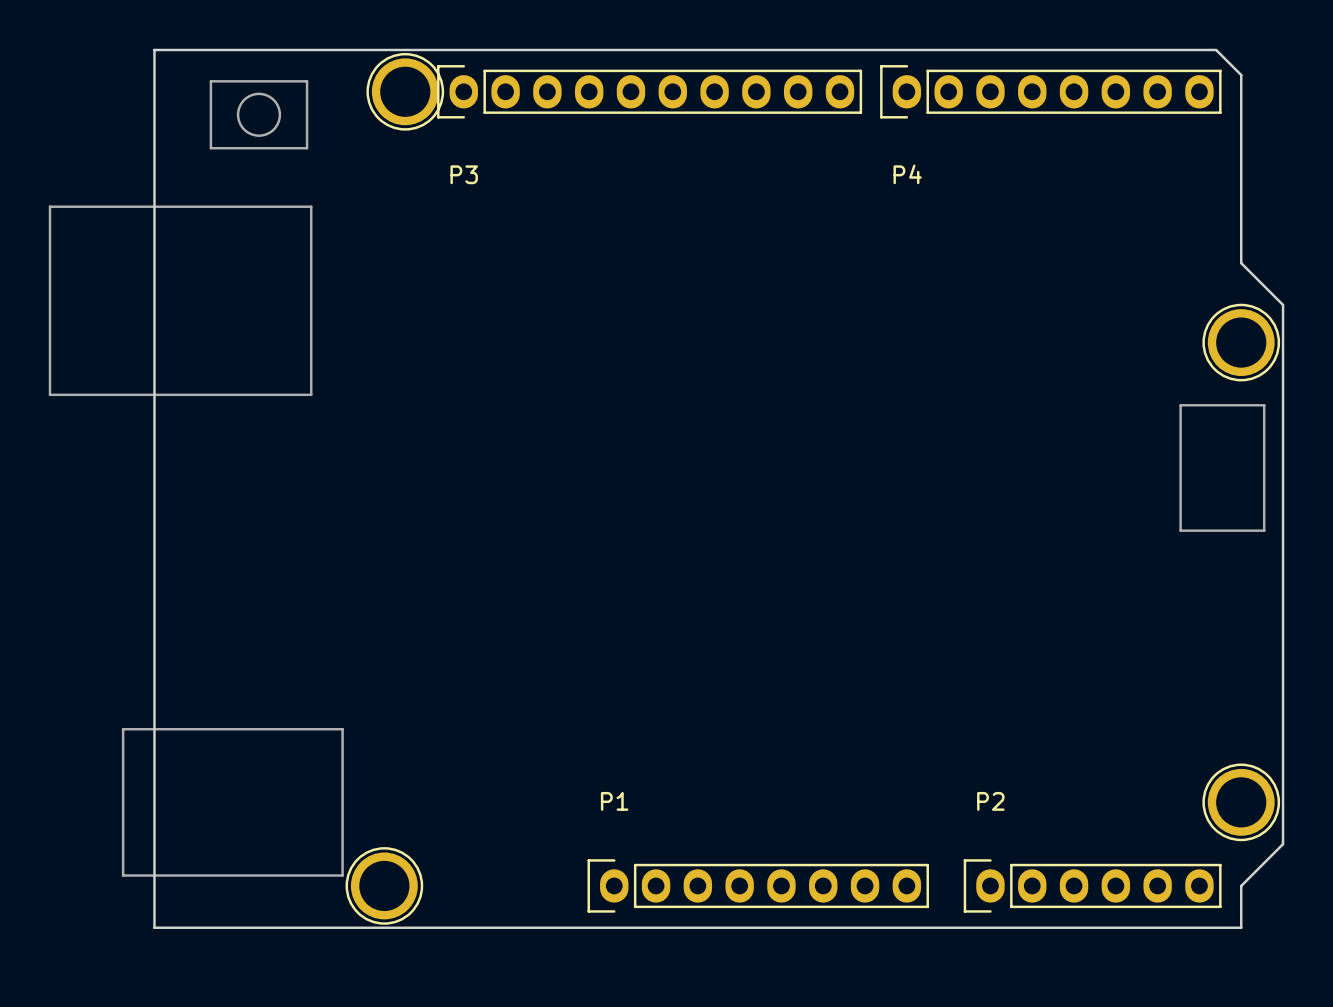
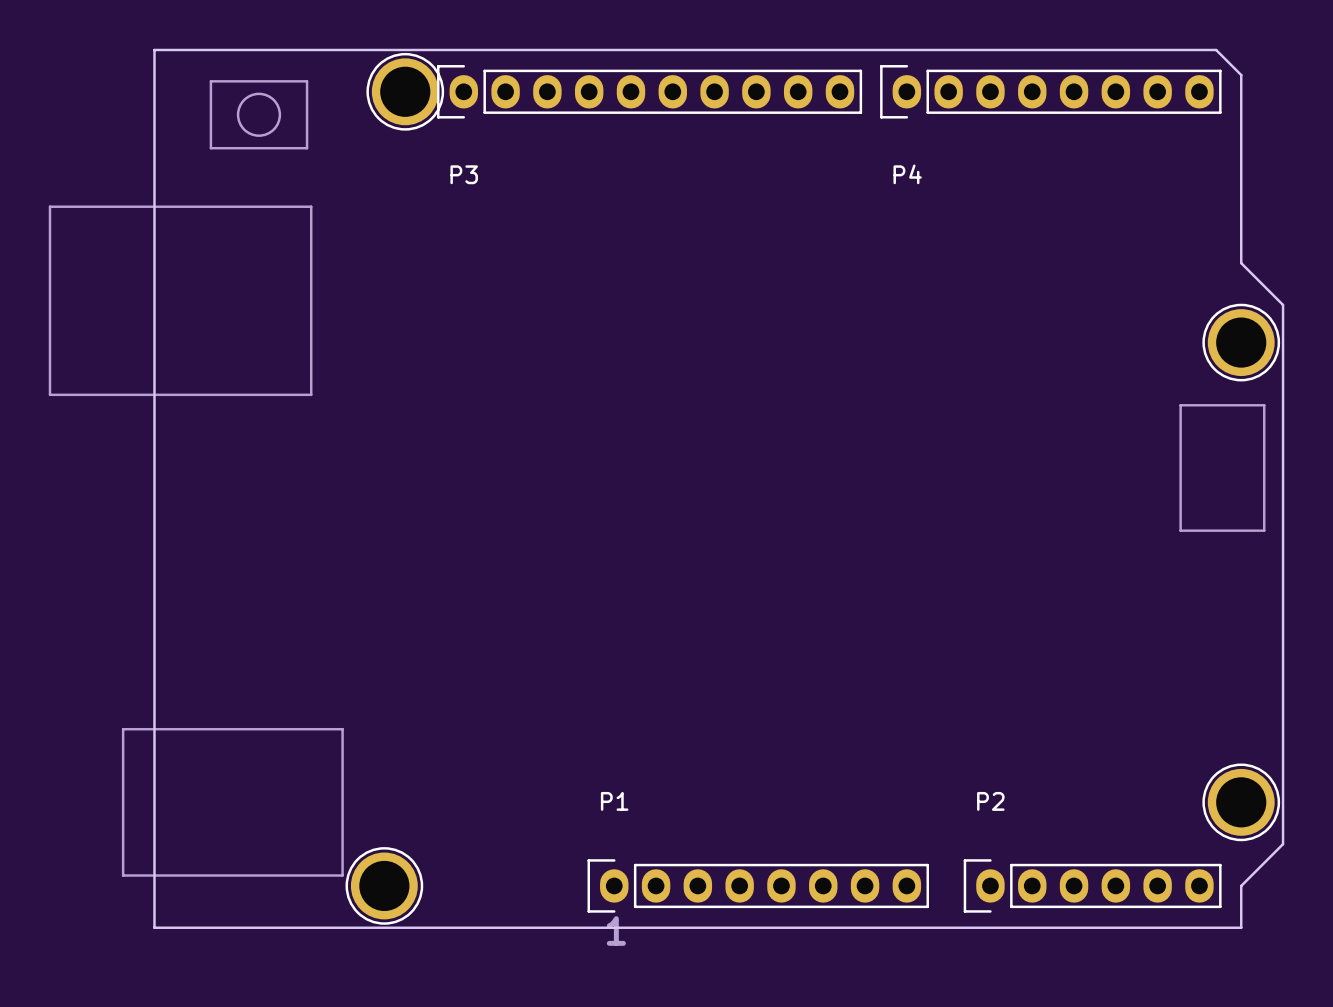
text: none -> 1 (616, 931)

